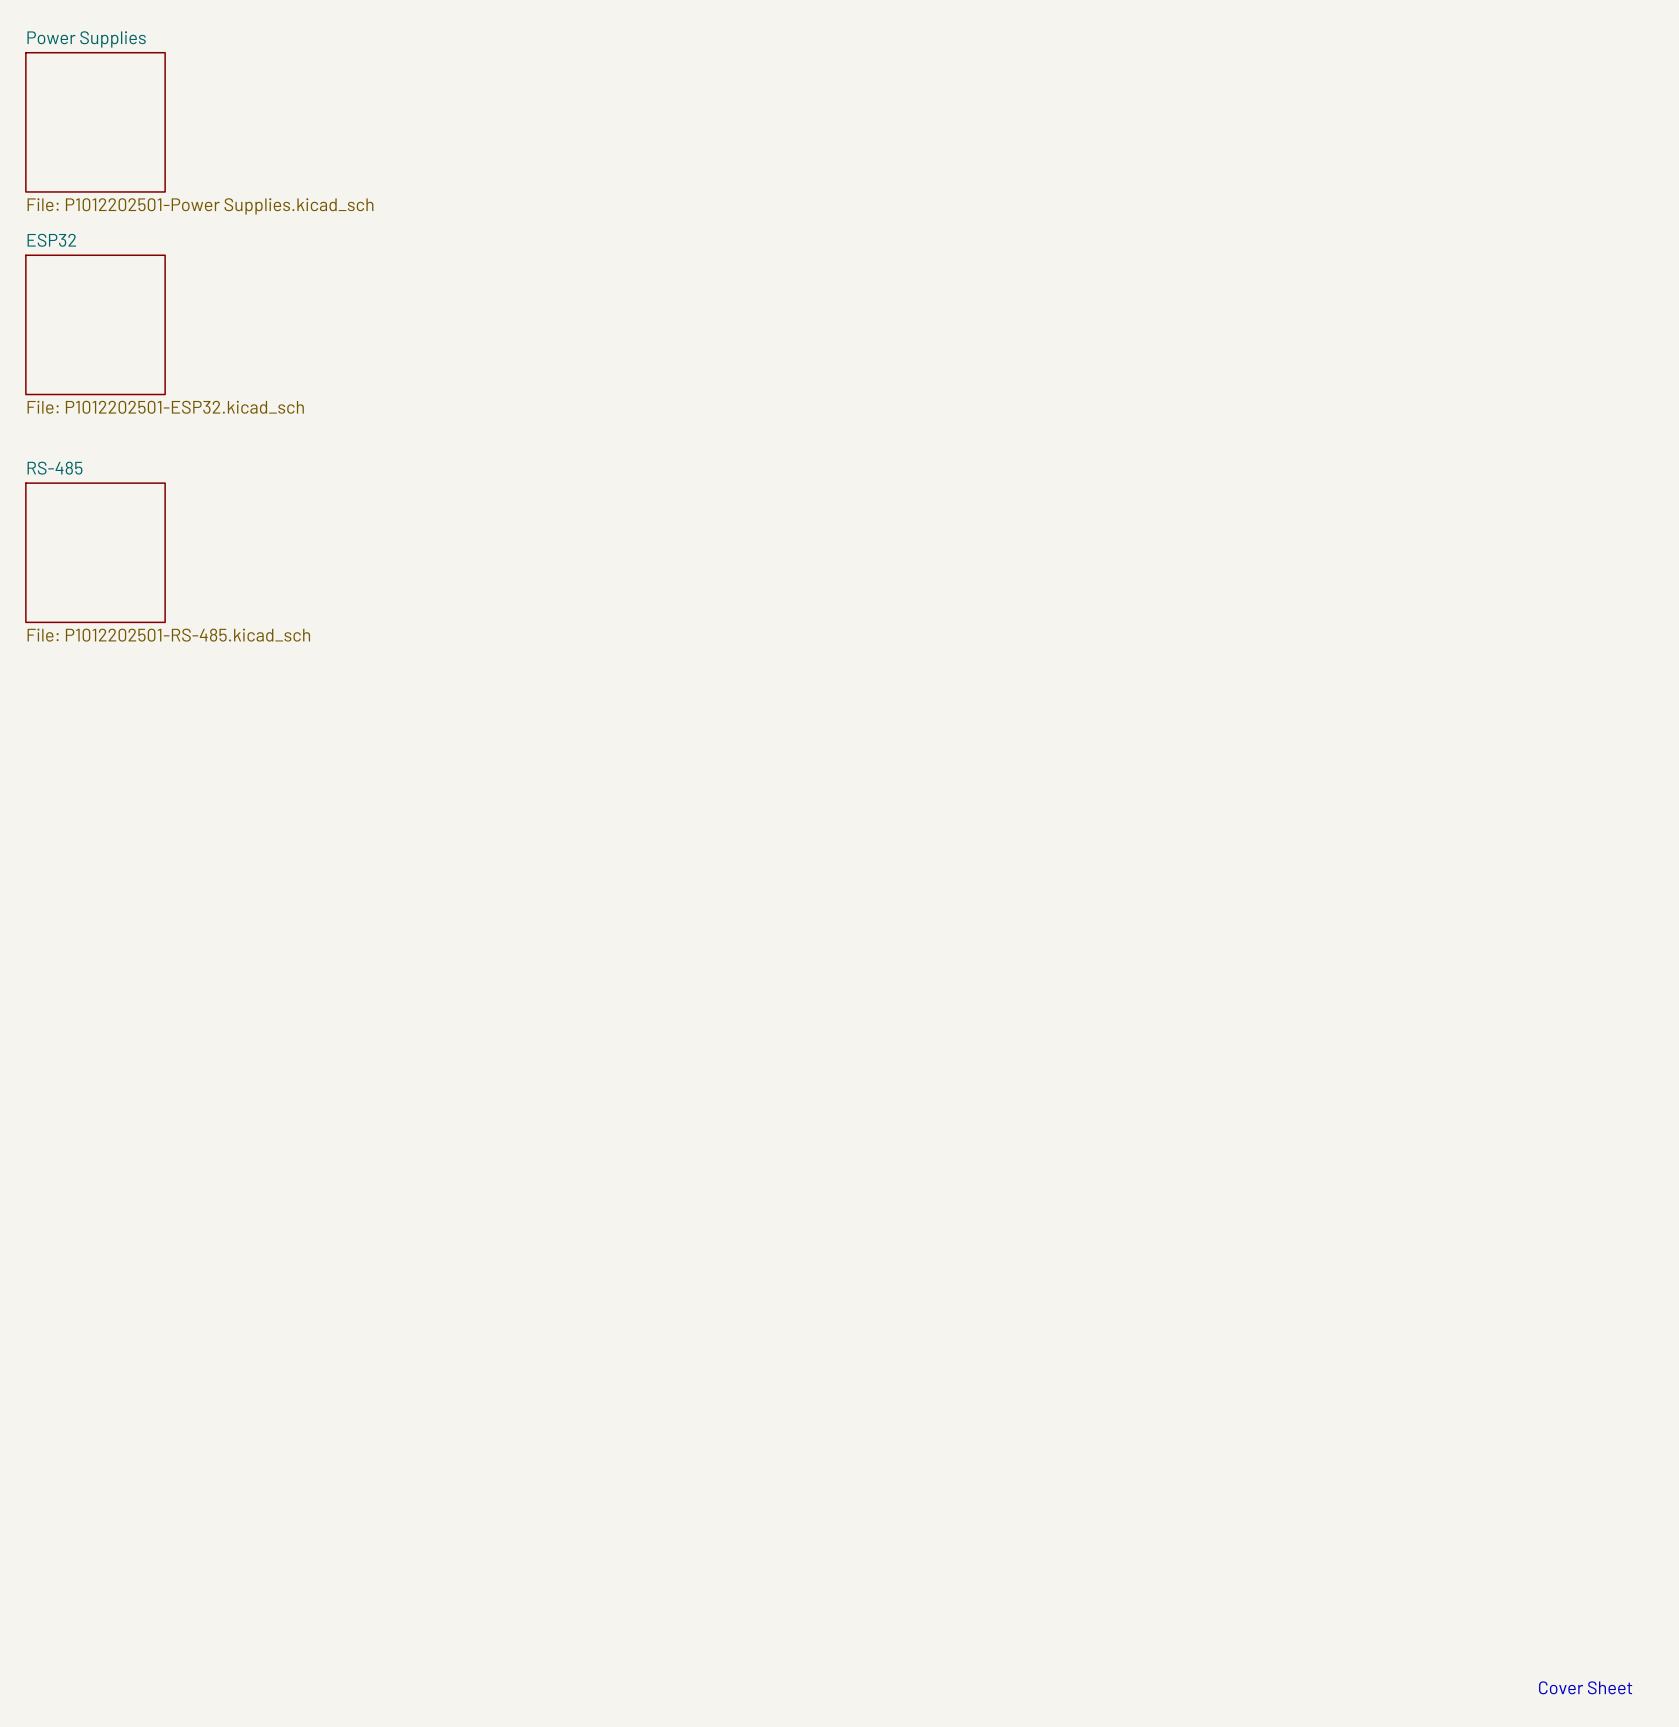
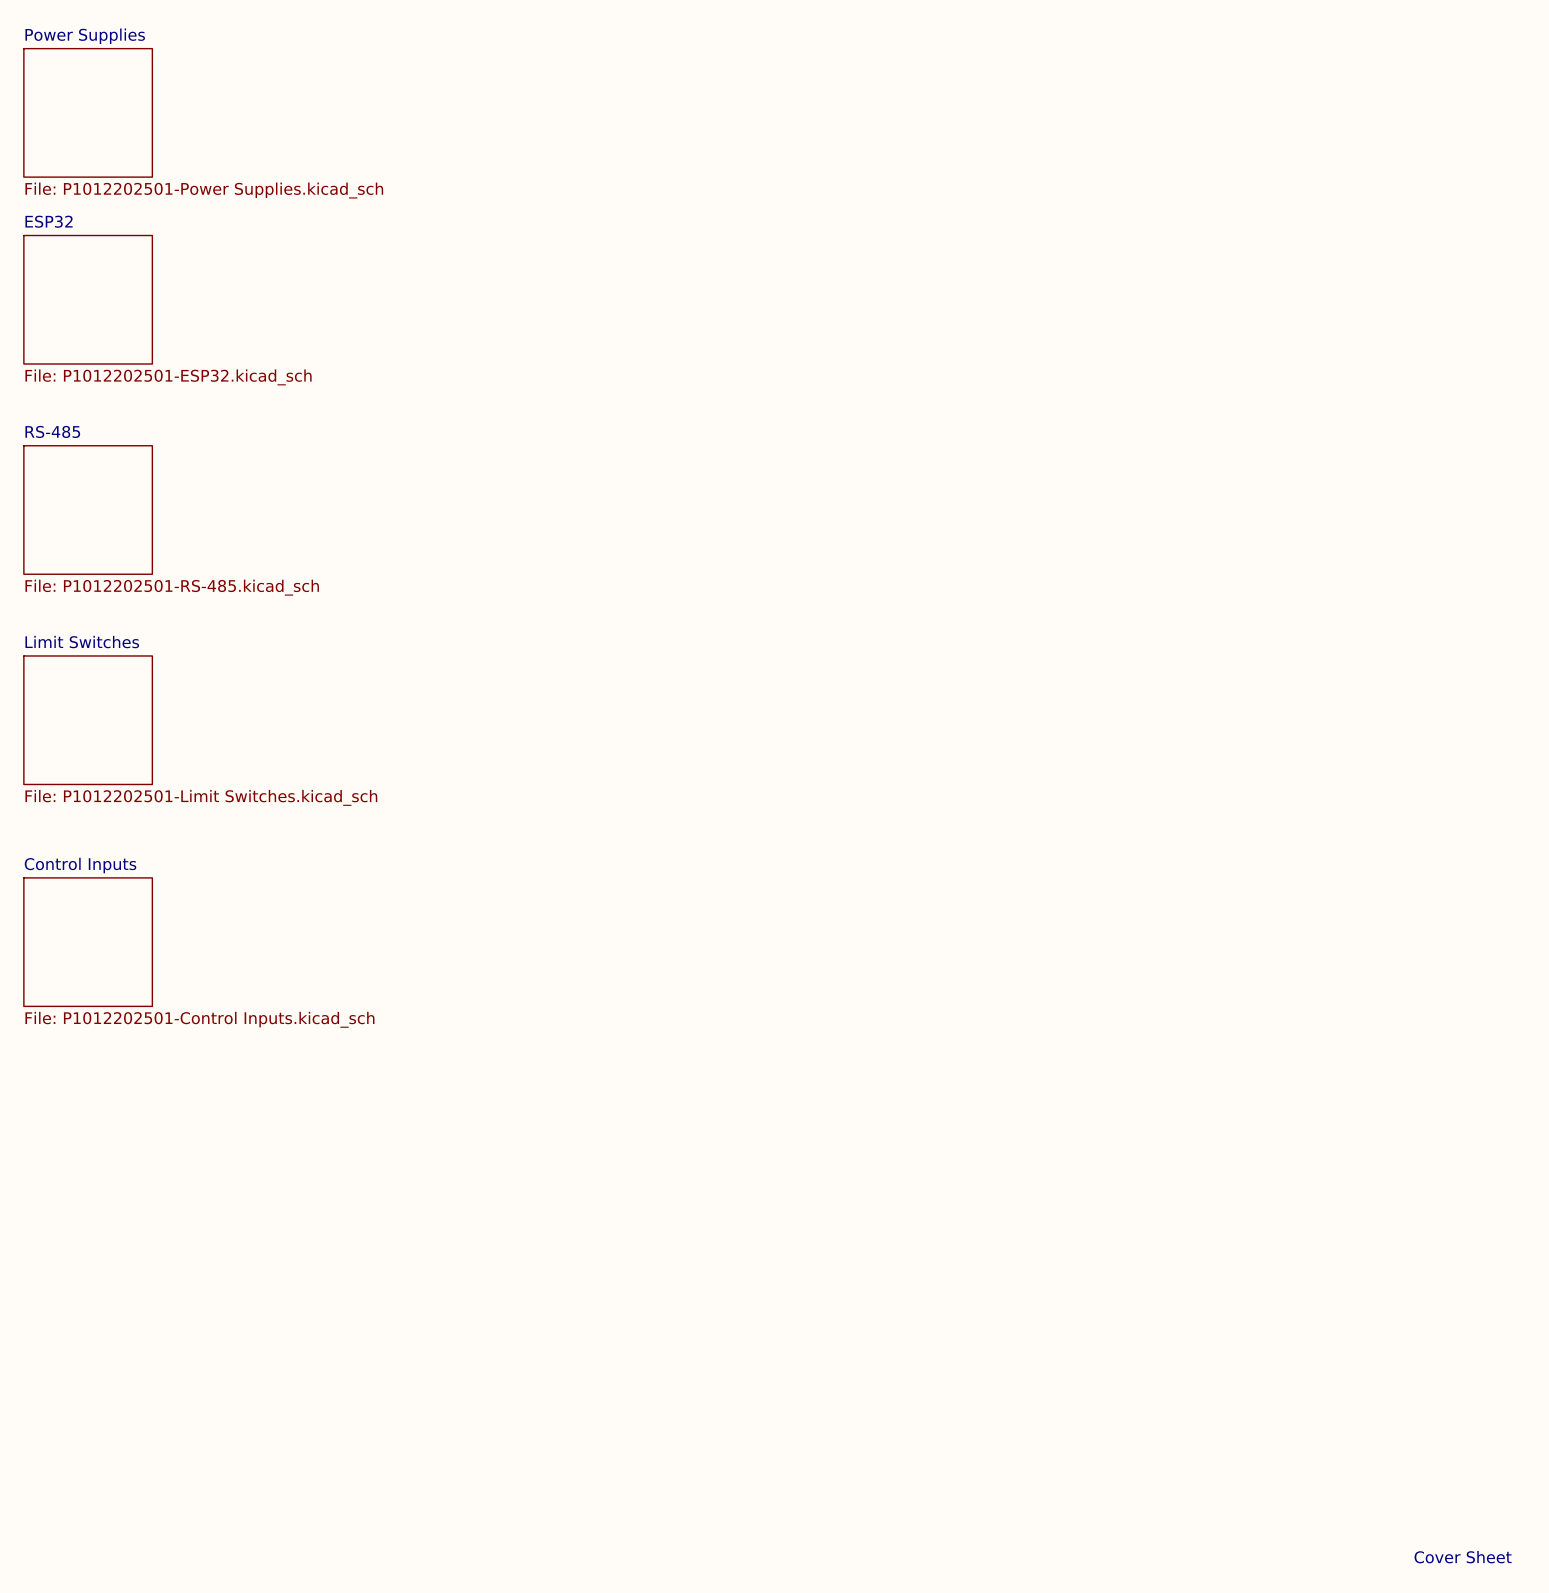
sheet Limit Switches: none -> File: P1012202501-Limit Switches.kicad_sch (88, 720)
sheet Control Inputs: none -> File: P1012202501-Control Inputs.kicad_sch (88, 942)

